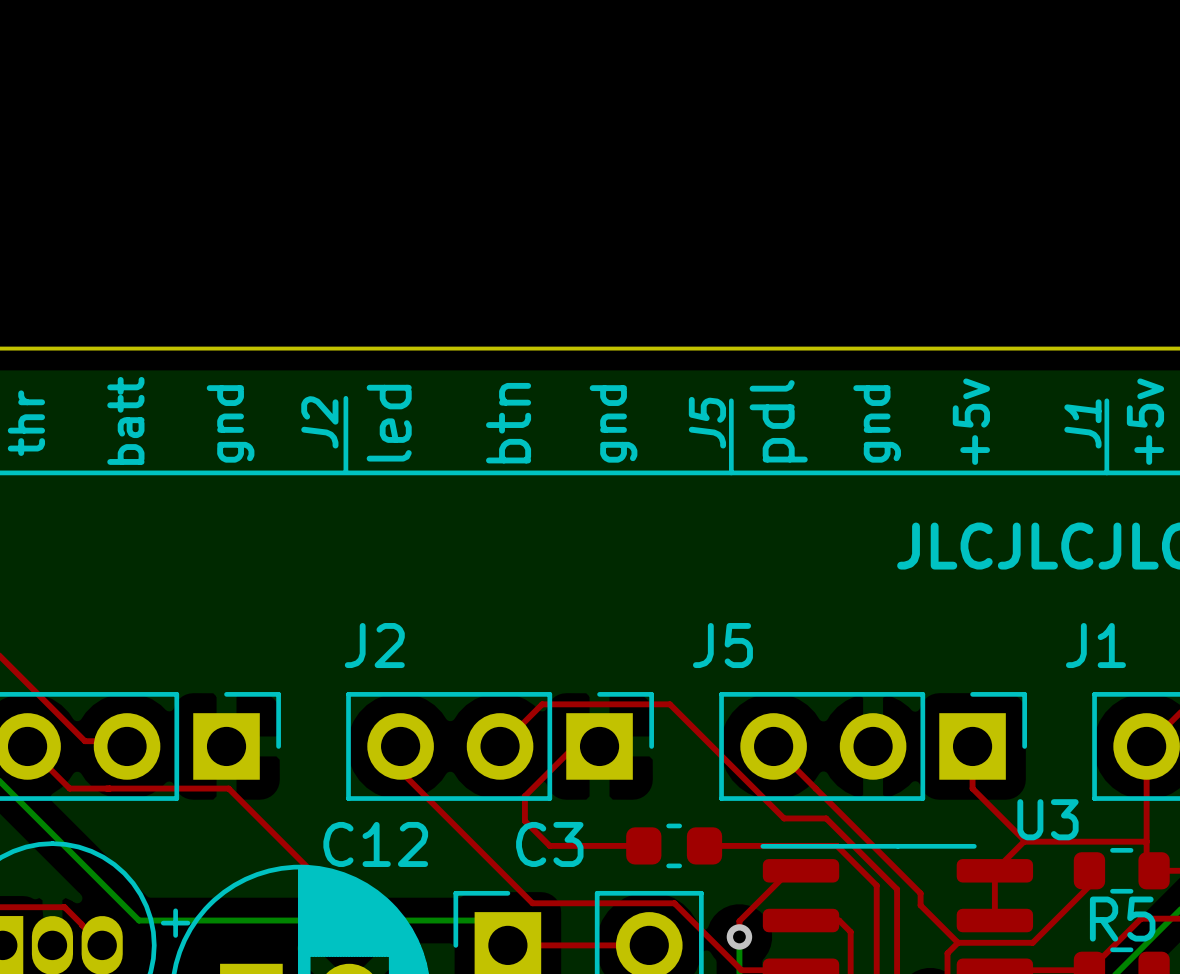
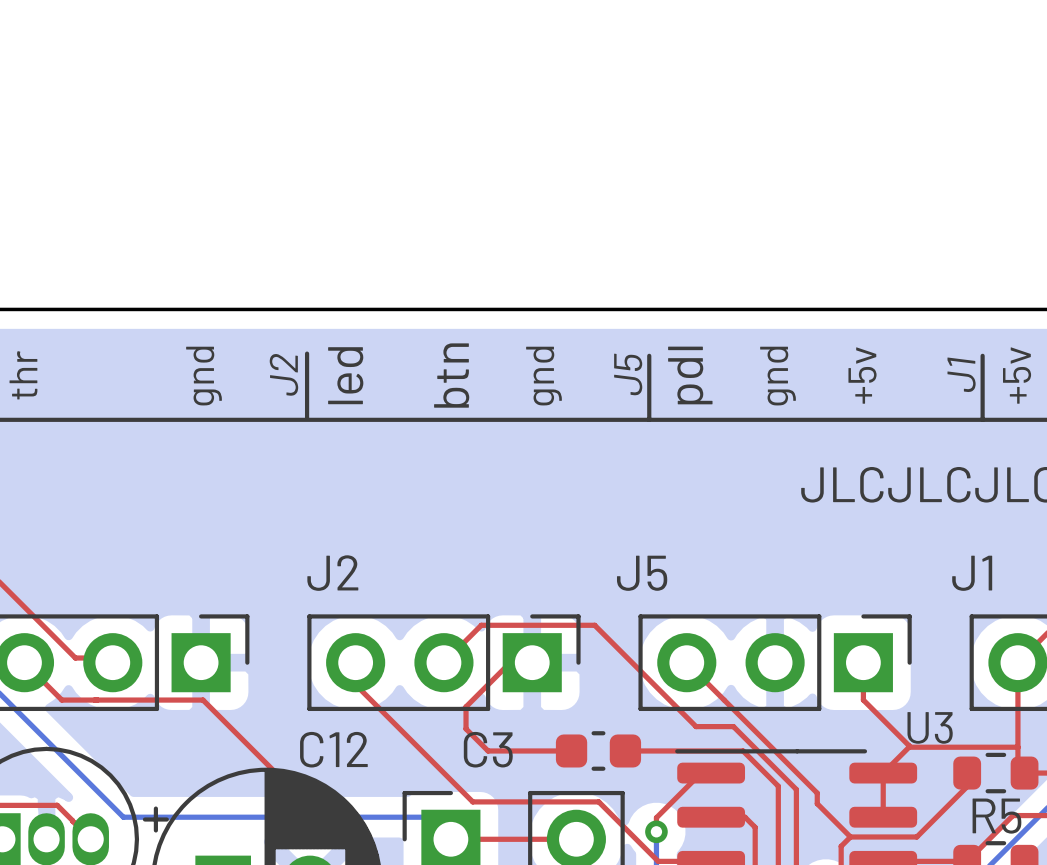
text: batt (125, 420) -> none

